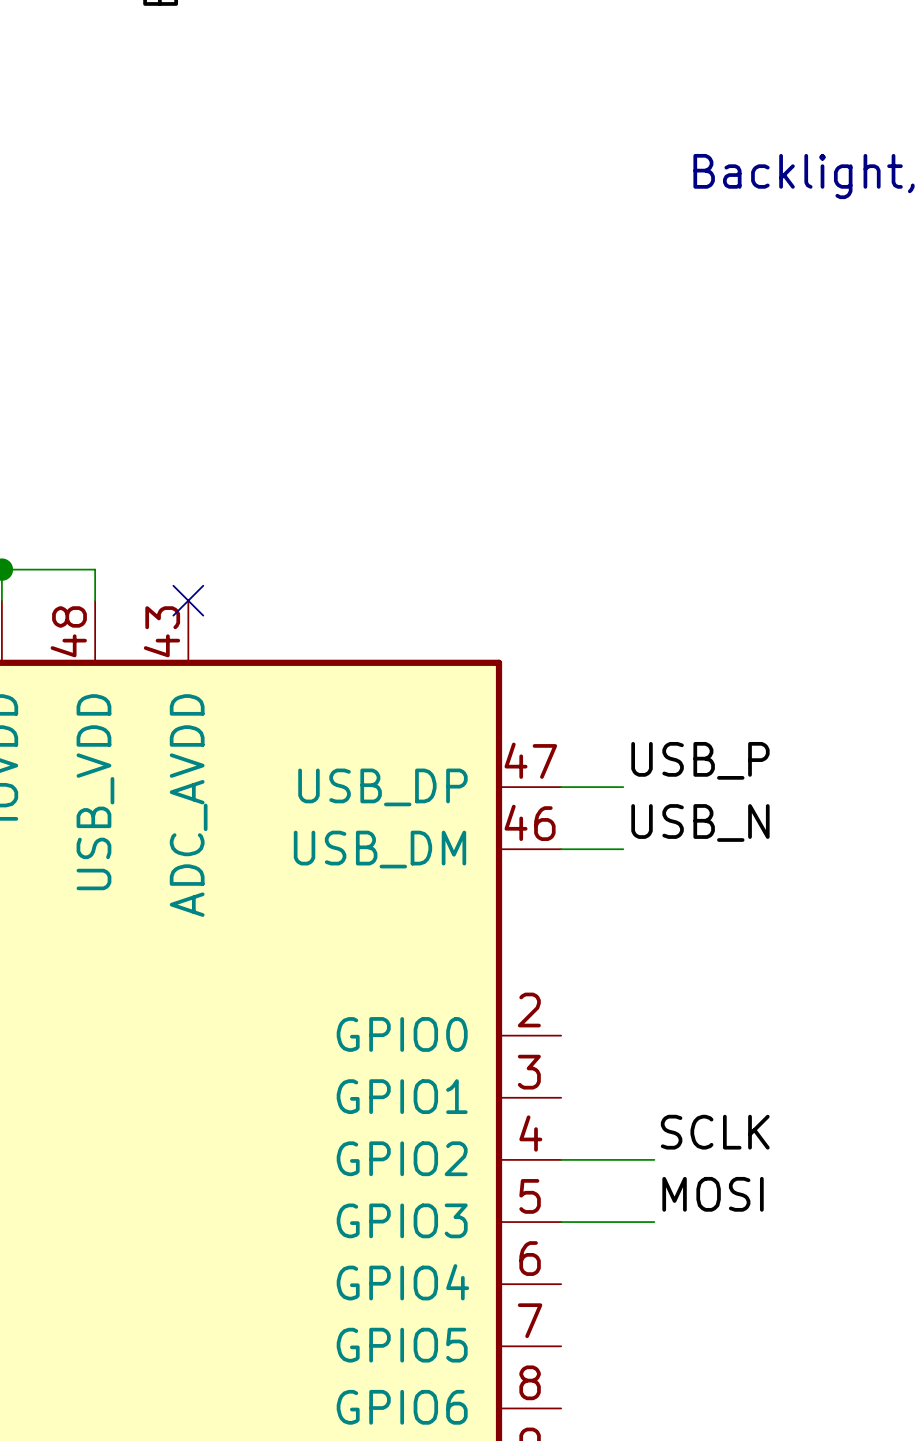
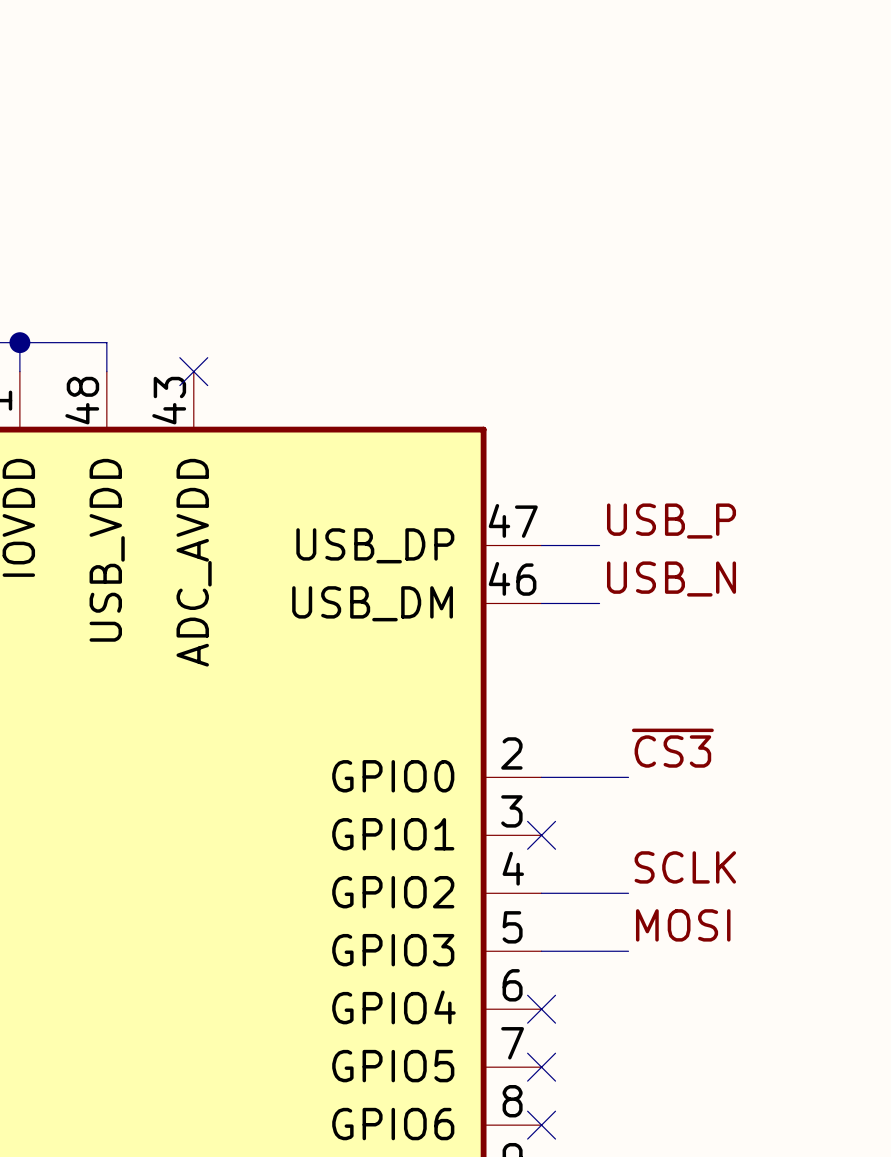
label: none -> ~{CS3} (672, 748)
wire: none -> (541, 777) (628, 777)
no-connect mark: none -> (541, 835)
no-connect mark: none -> (541, 1009)
no-connect mark: none -> (541, 1067)
no-connect mark: none -> (541, 1125)

